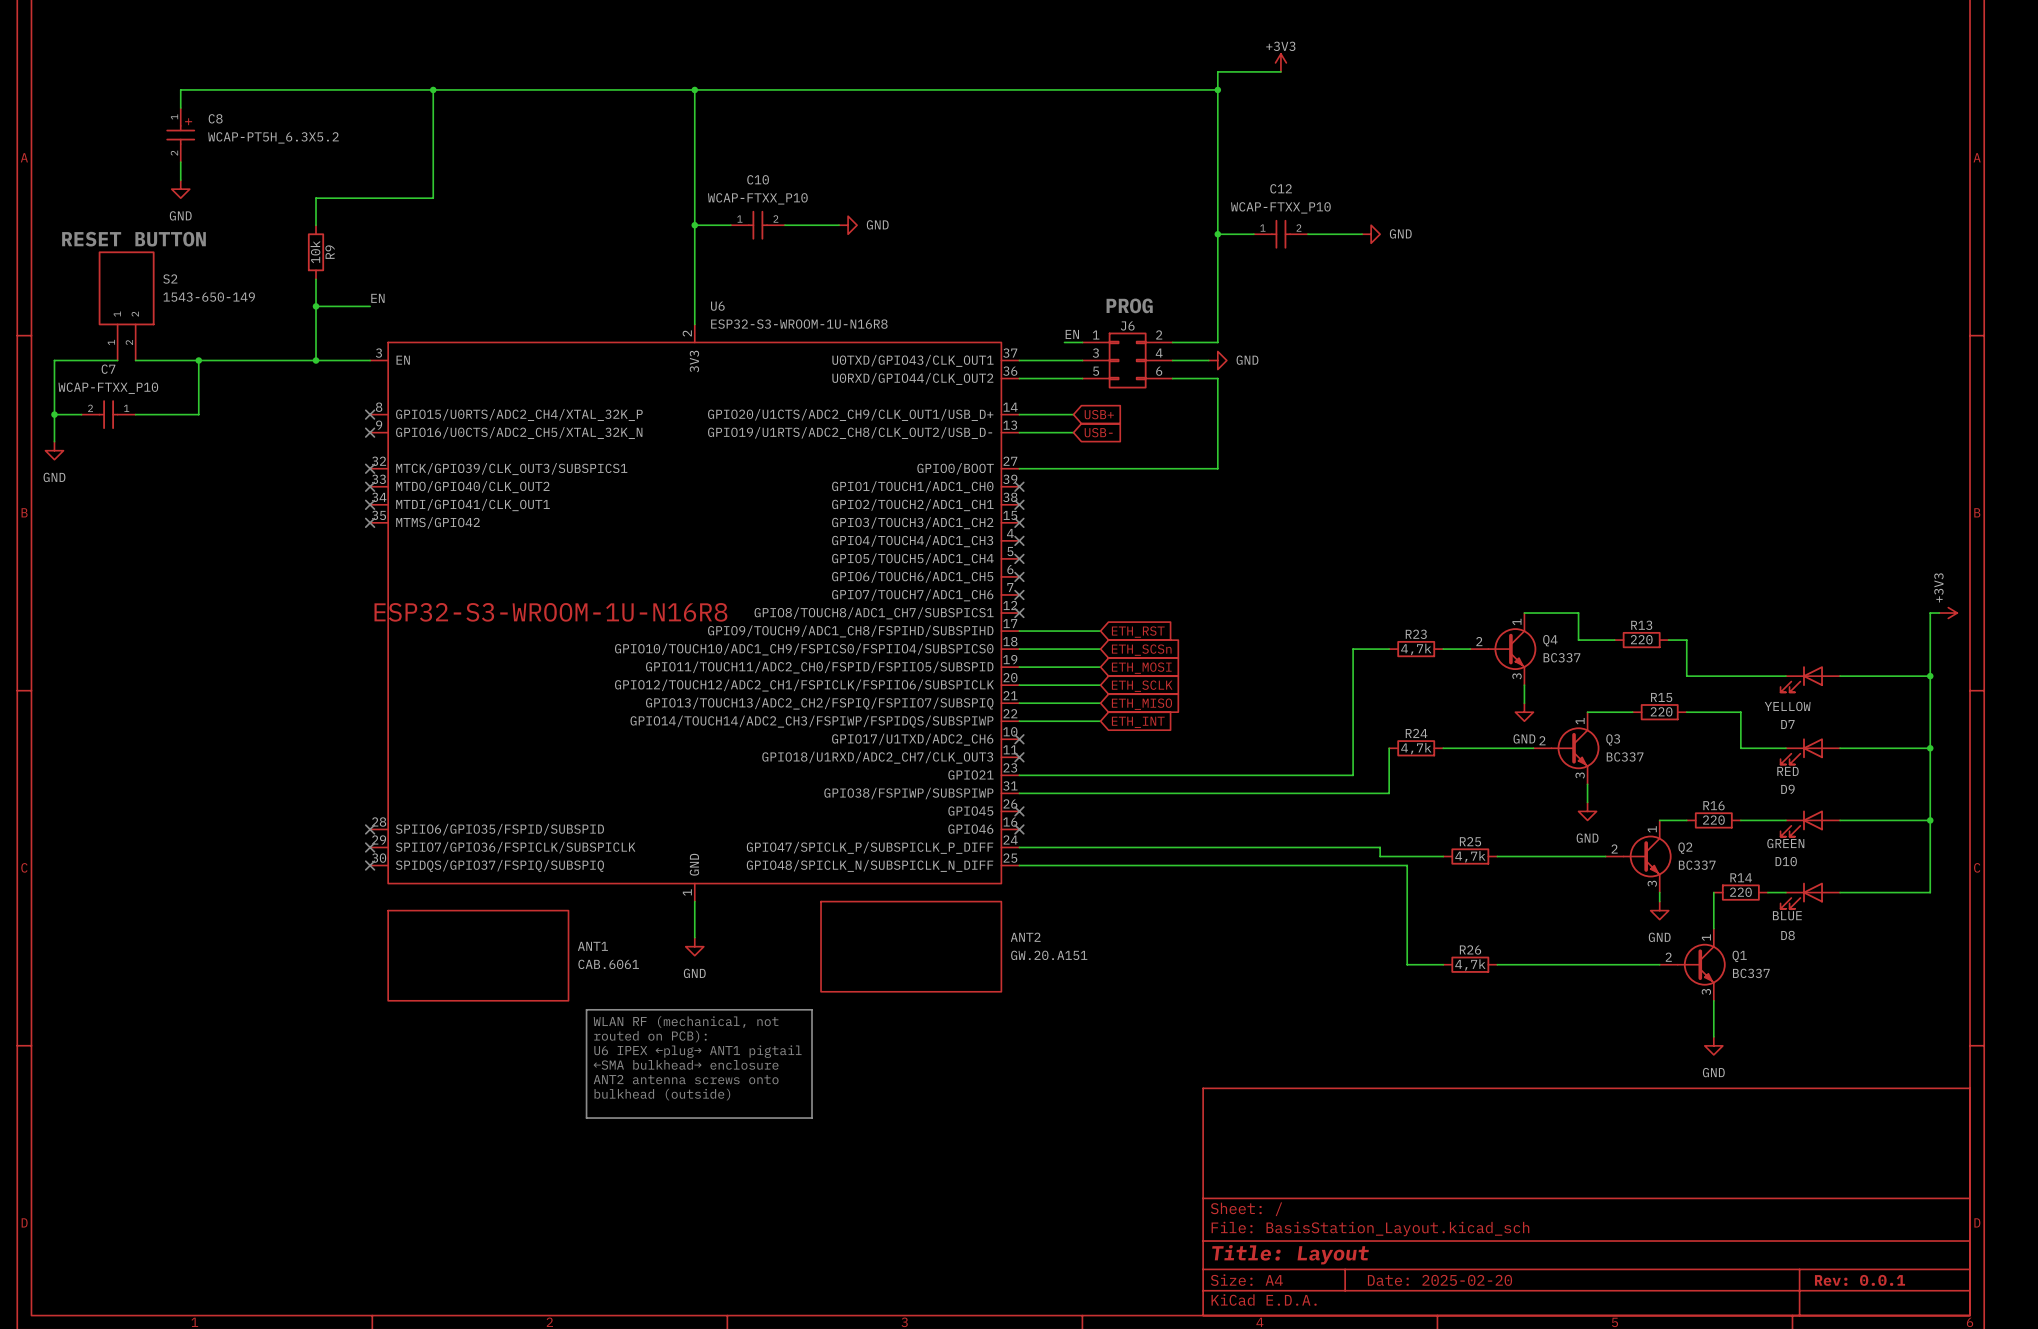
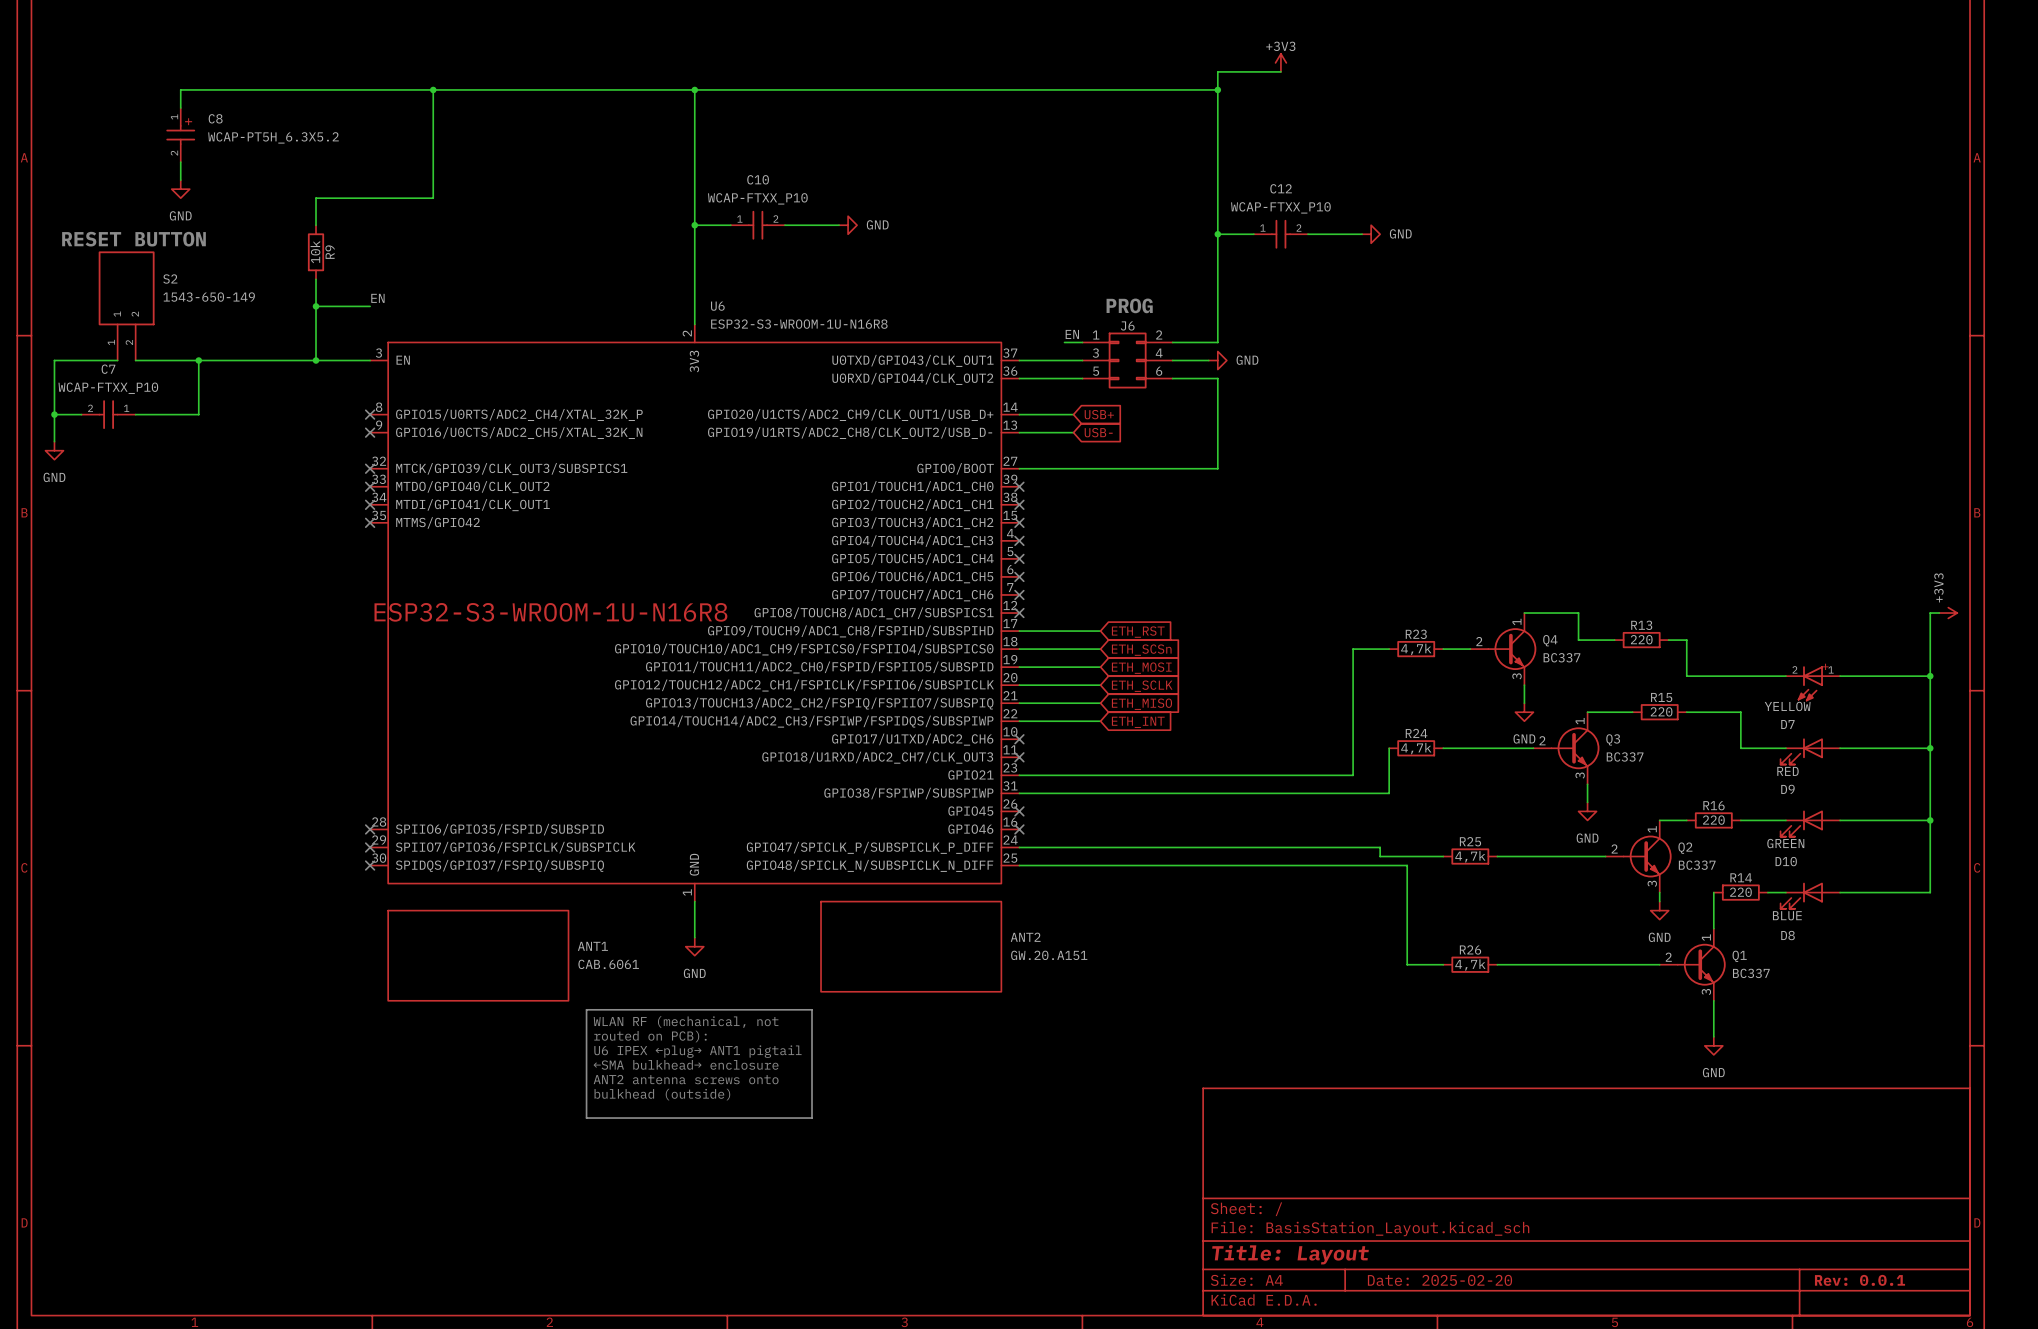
D7 symbol: [1780, 666, 1841, 693] -> [1785, 666, 1841, 702]

